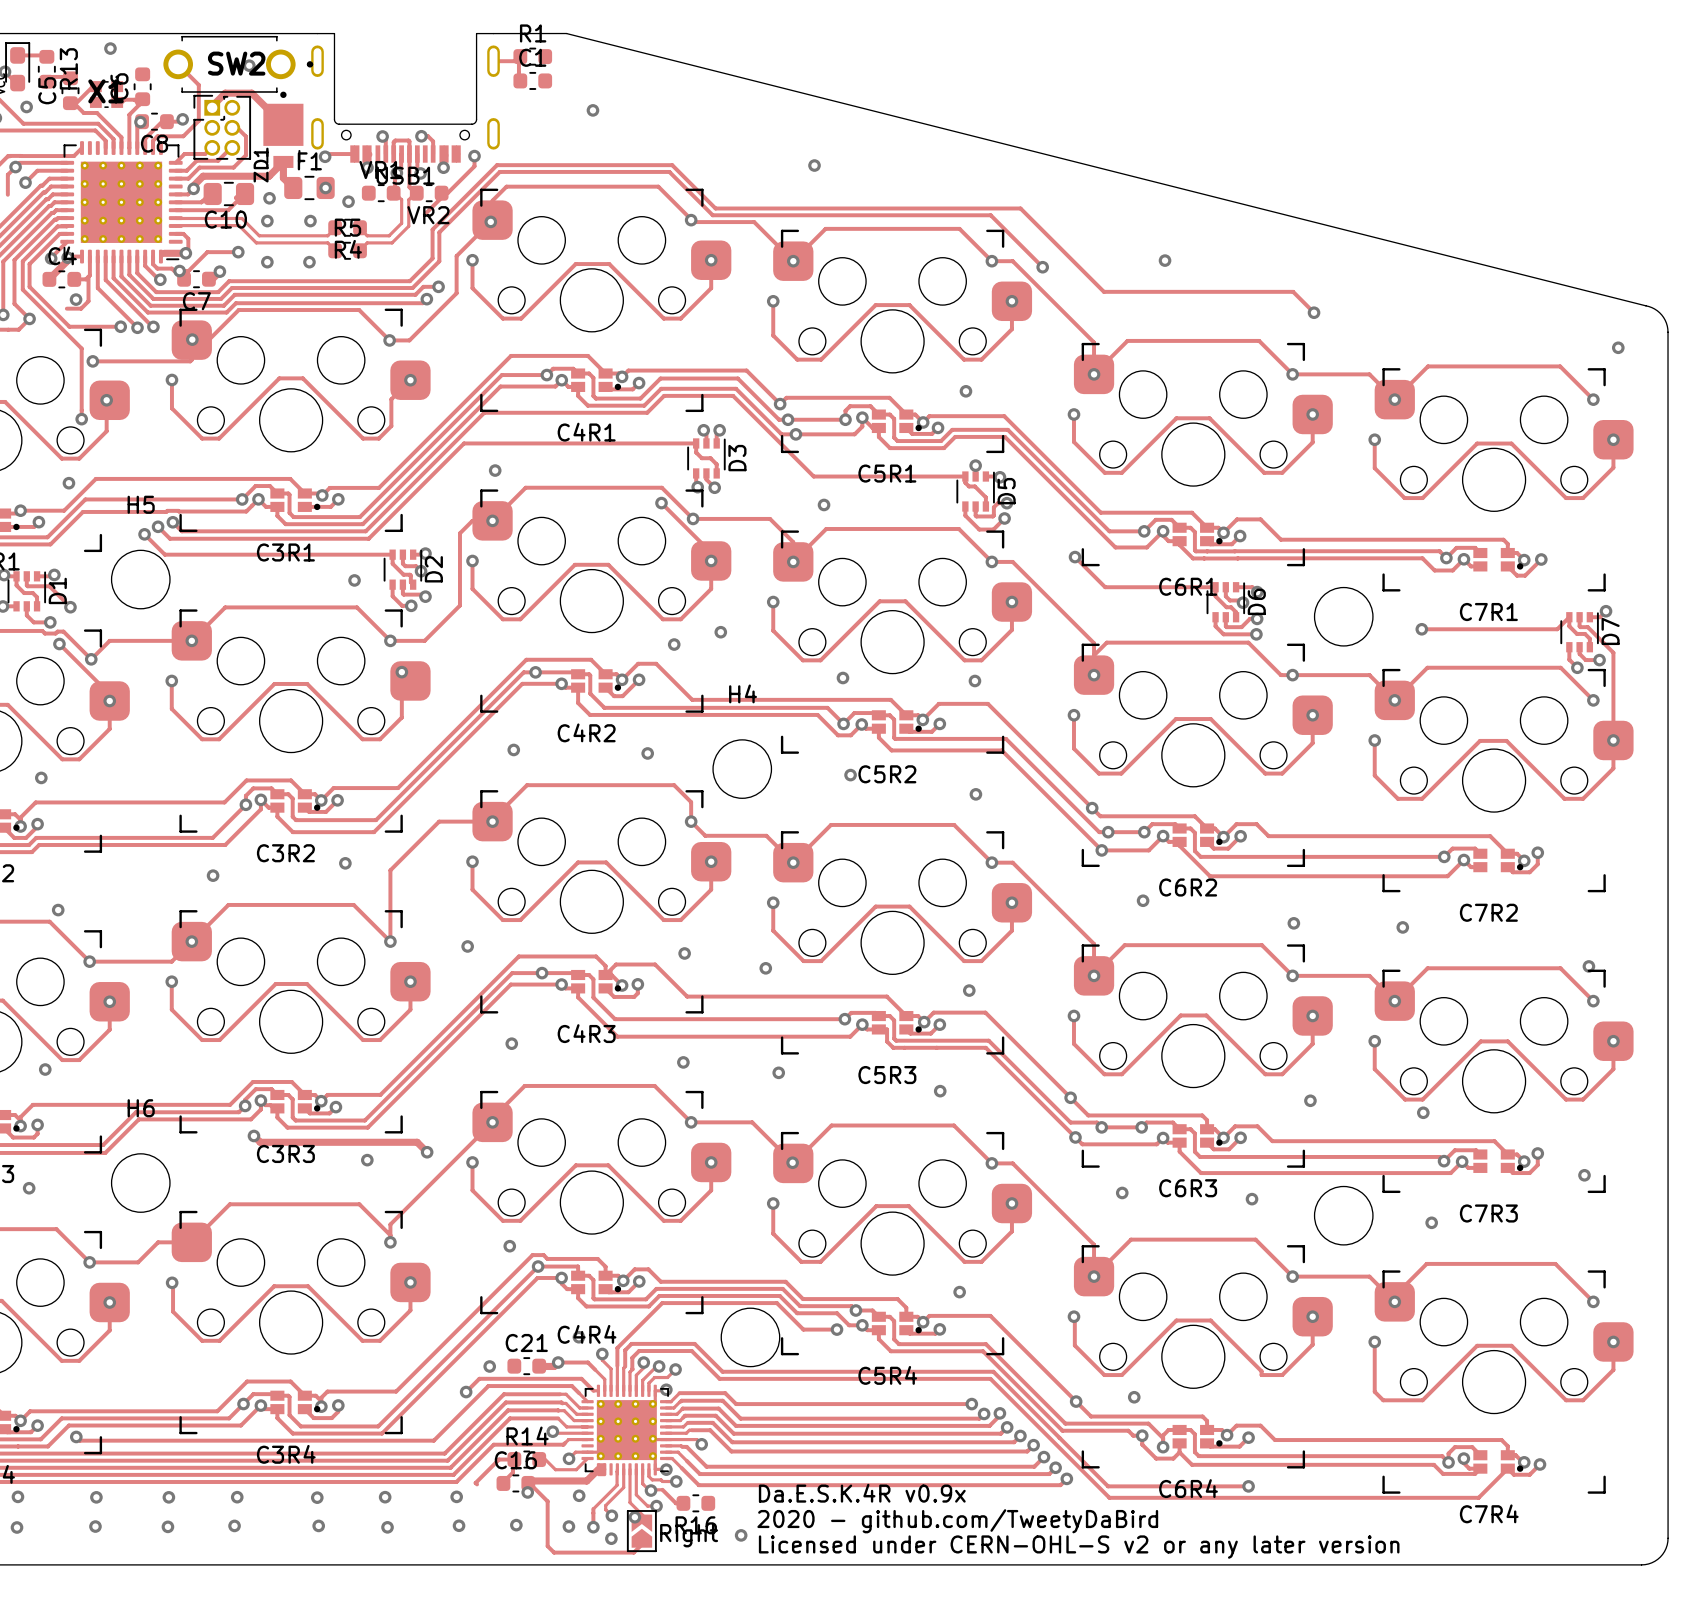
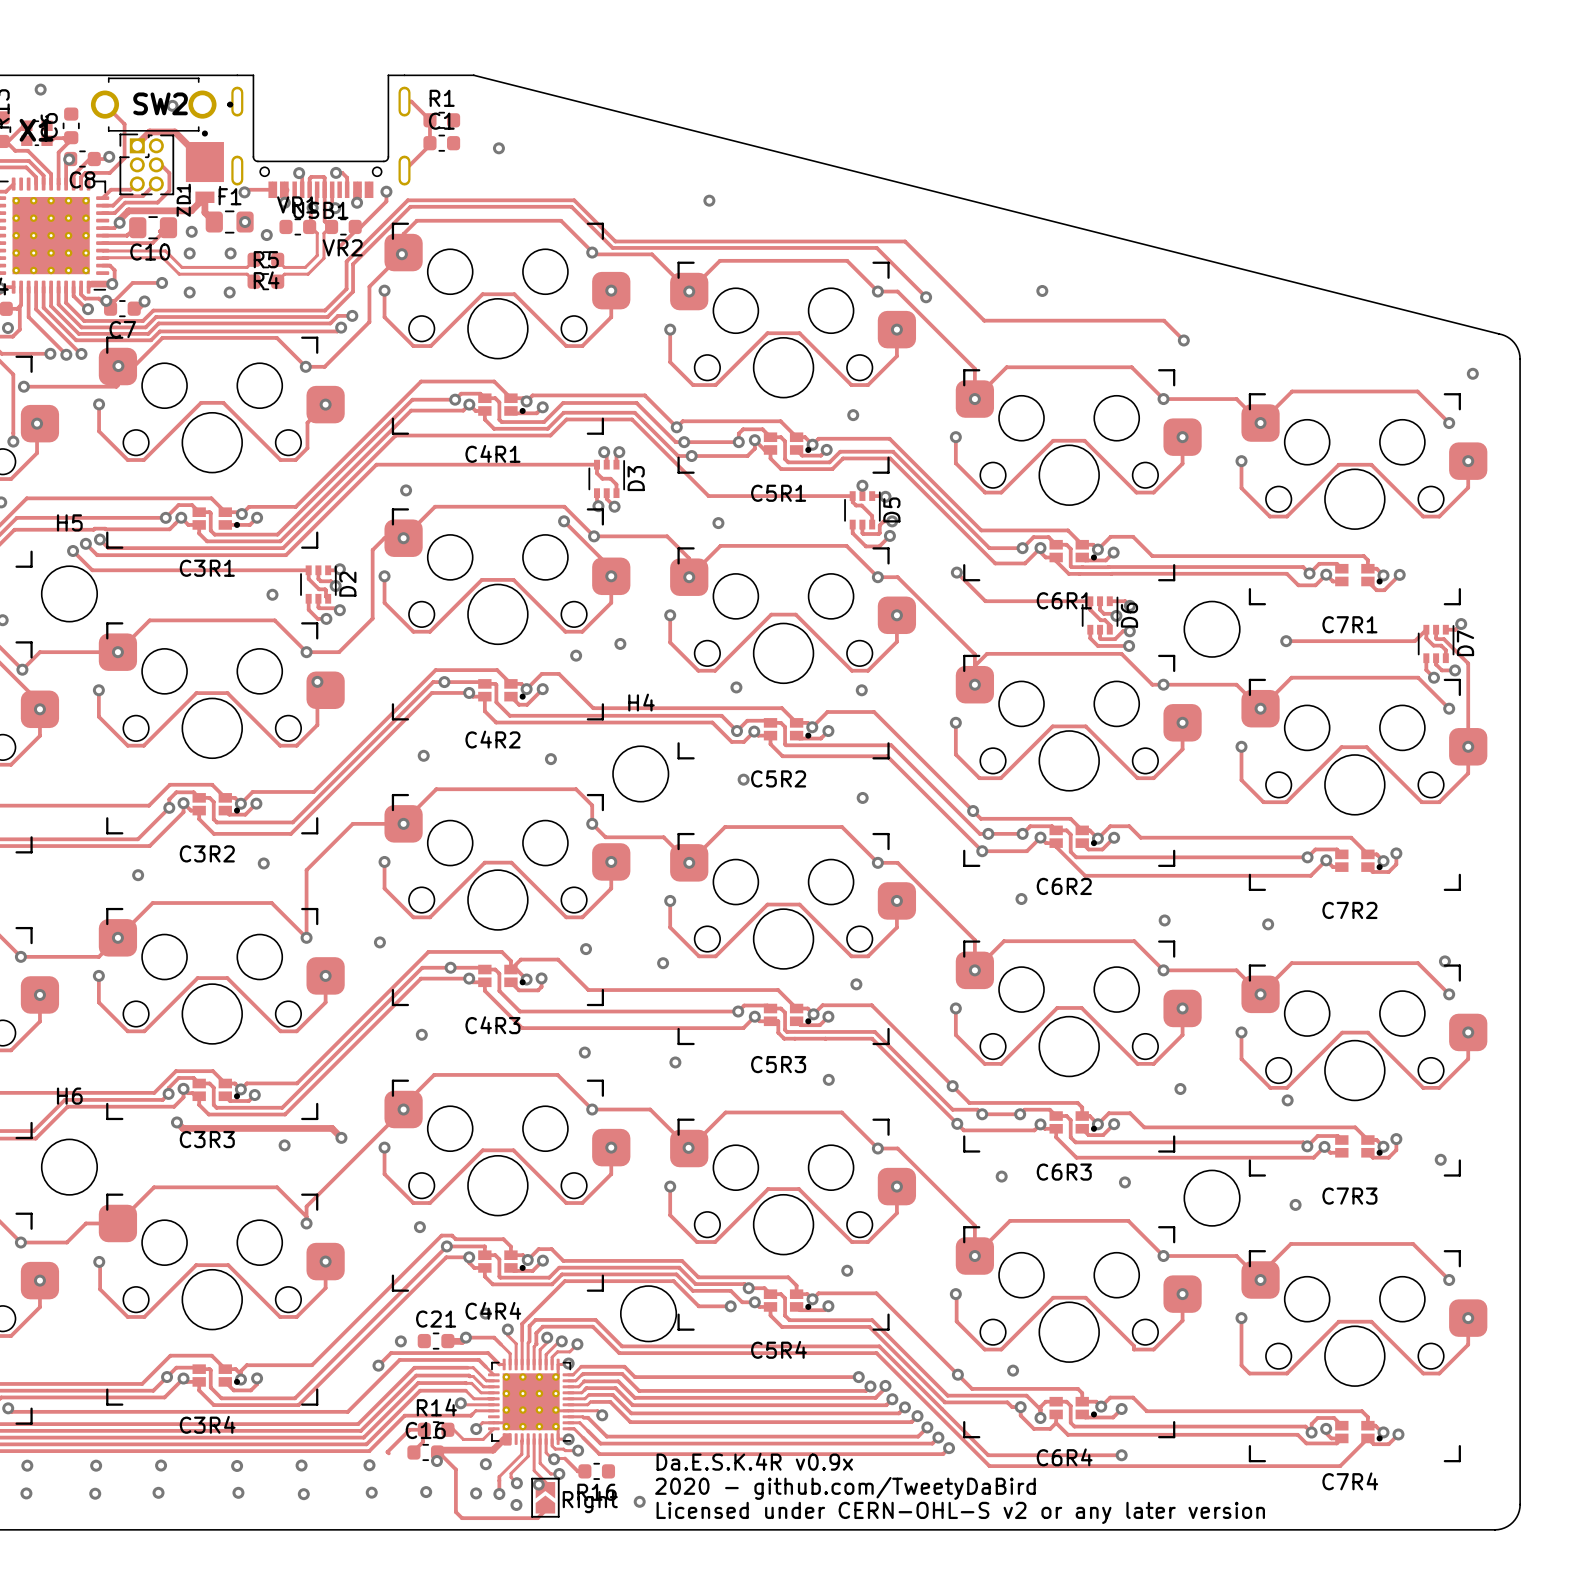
R1: (532, 56) -> none
C1 name: C1 (532, 57) -> R1 (442, 98)
track: (500, 61) (514, 61) (518, 56) (518, 80) -> (411, 101) (429, 120) (429, 145) (404, 170)
C1: none -> (441, 143)

